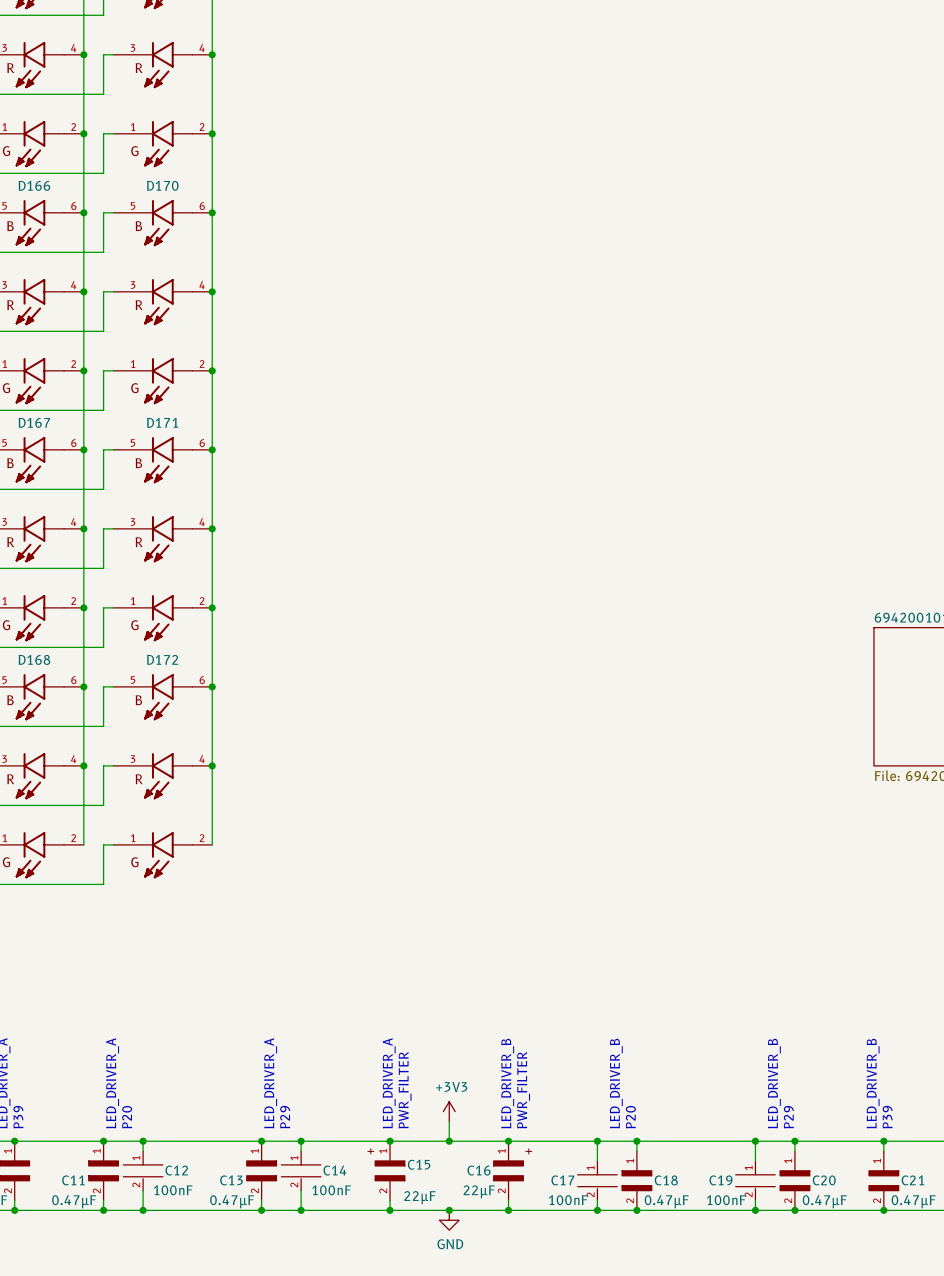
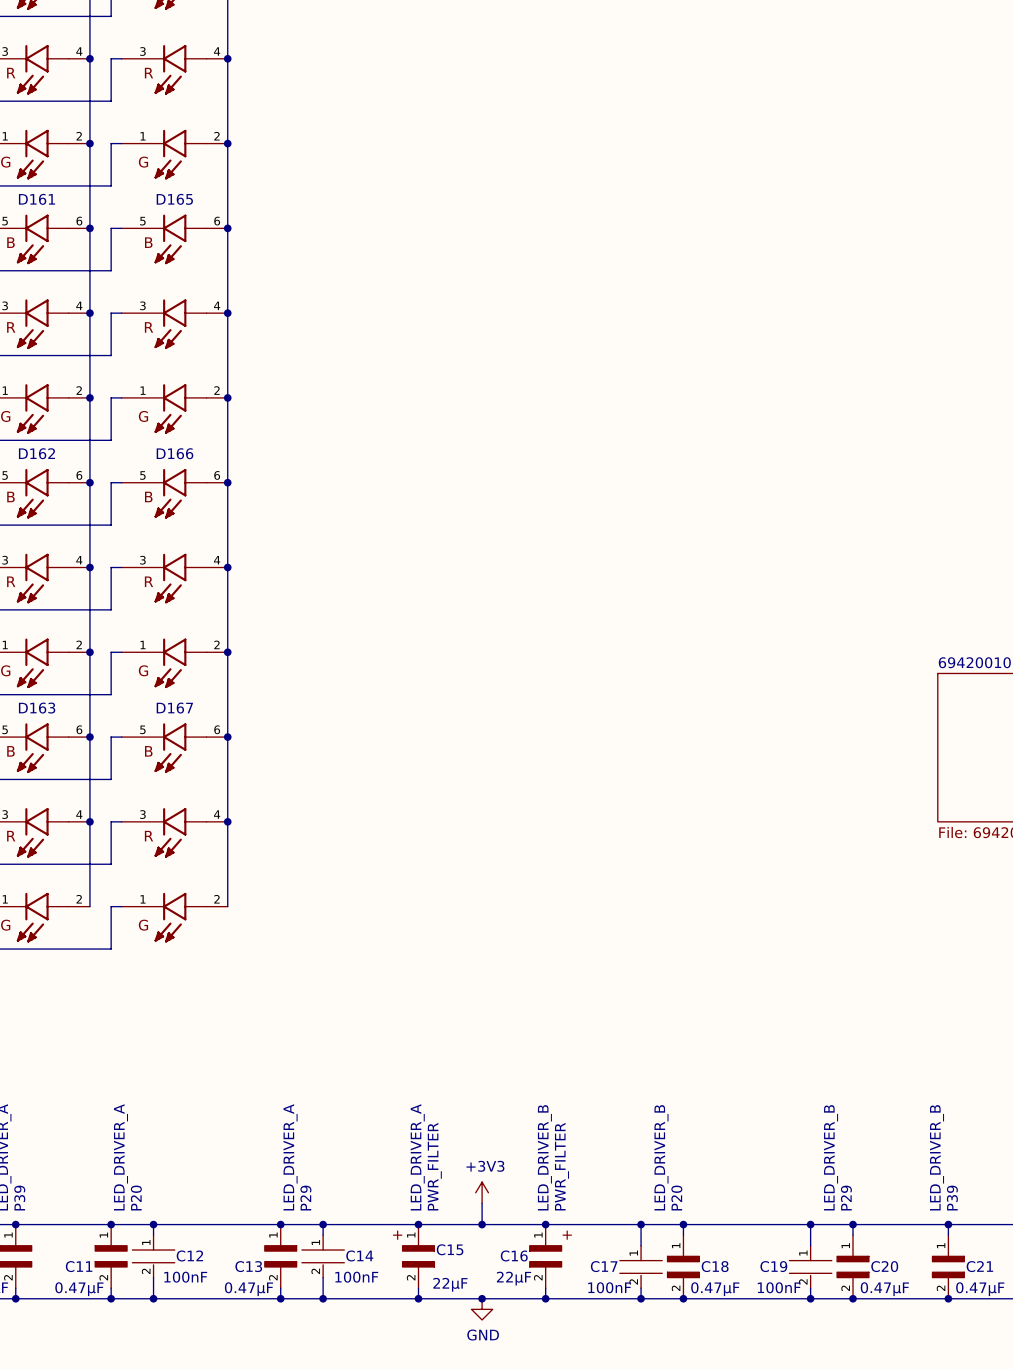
D166 name: D166 (34, 185) -> D161 (37, 199)
D170 name: D170 (162, 185) -> D165 (174, 199)
D167 name: D167 (34, 422) -> D162 (36, 453)
D171 name: D171 (162, 422) -> D166 (174, 453)
D168 name: D168 (34, 659) -> D163 (37, 708)
D172 name: D172 (162, 659) -> D167 (174, 708)

